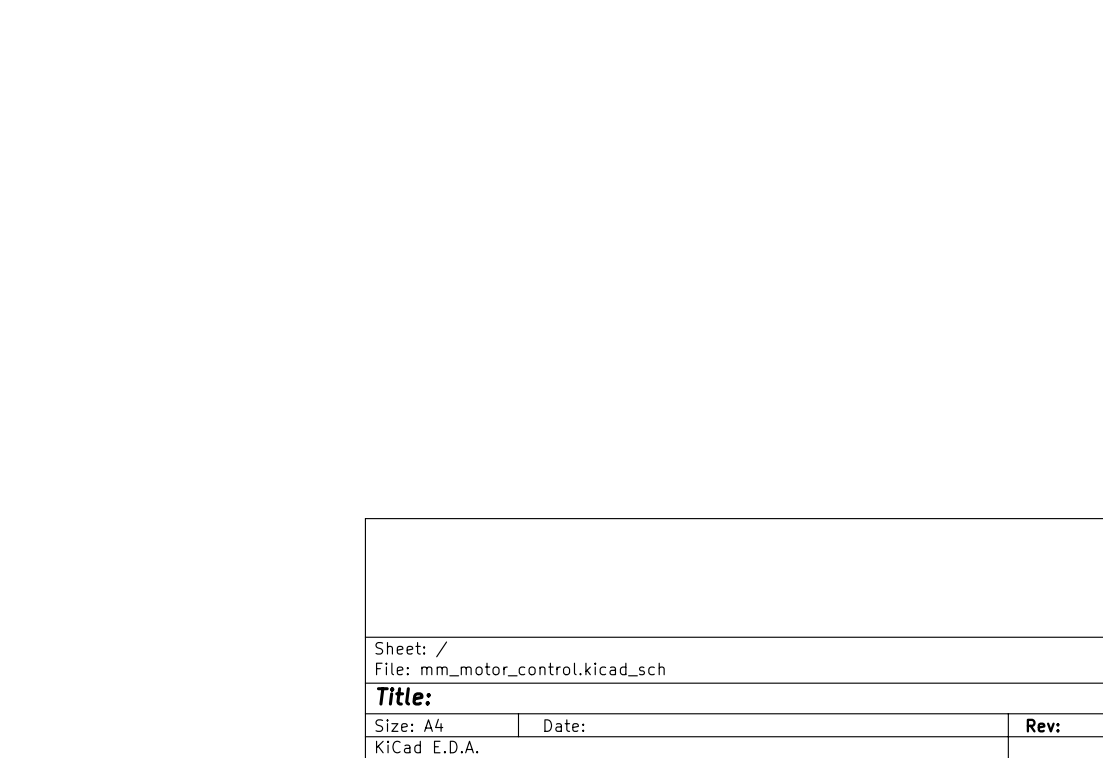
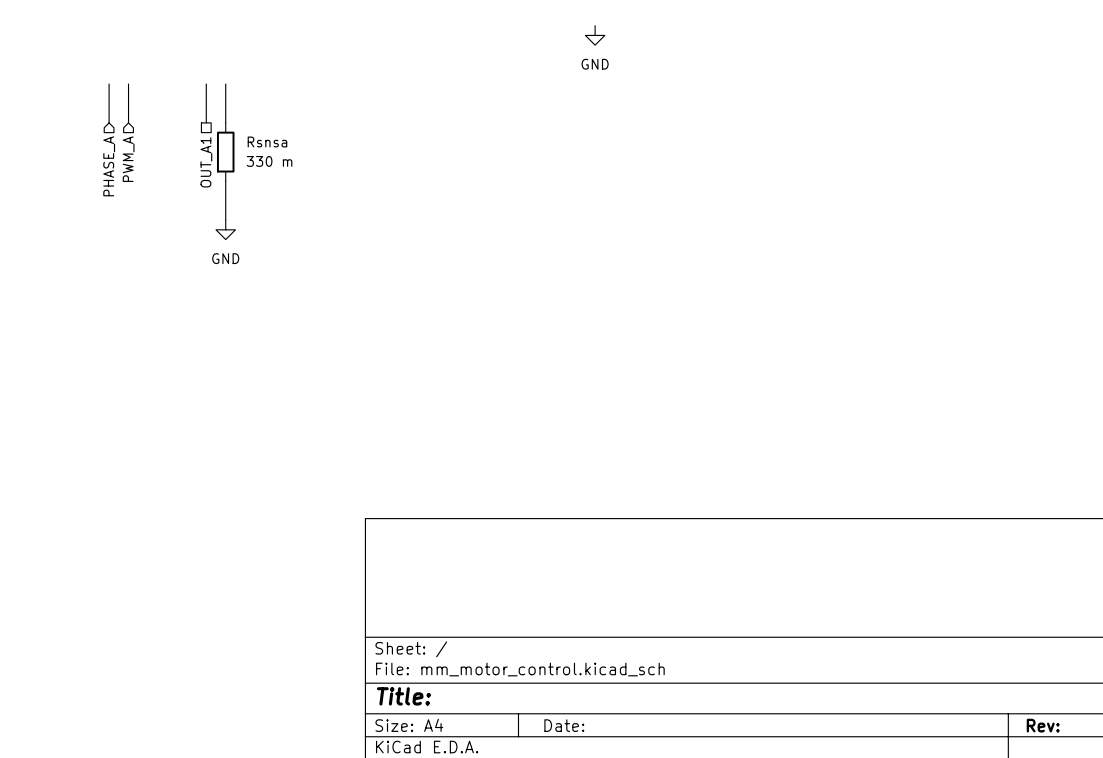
power symbol: none -> GND (595, 35)
wire: none -> (109, 84) (109, 122)
wire: none -> (128, 84) (128, 122)
wire: none -> (206, 84) (206, 122)
wire: none -> (225, 84) (225, 122)
Rsnsa: none -> 330 m (225, 152)
hierarchical label: none -> PWM_A (128, 159)
hierarchical label: none -> OUT_A1 (206, 162)
hierarchical label: none -> PHASE_A (109, 166)
wire: none -> (225, 181) (225, 220)
power symbol: none -> GND (225, 229)

